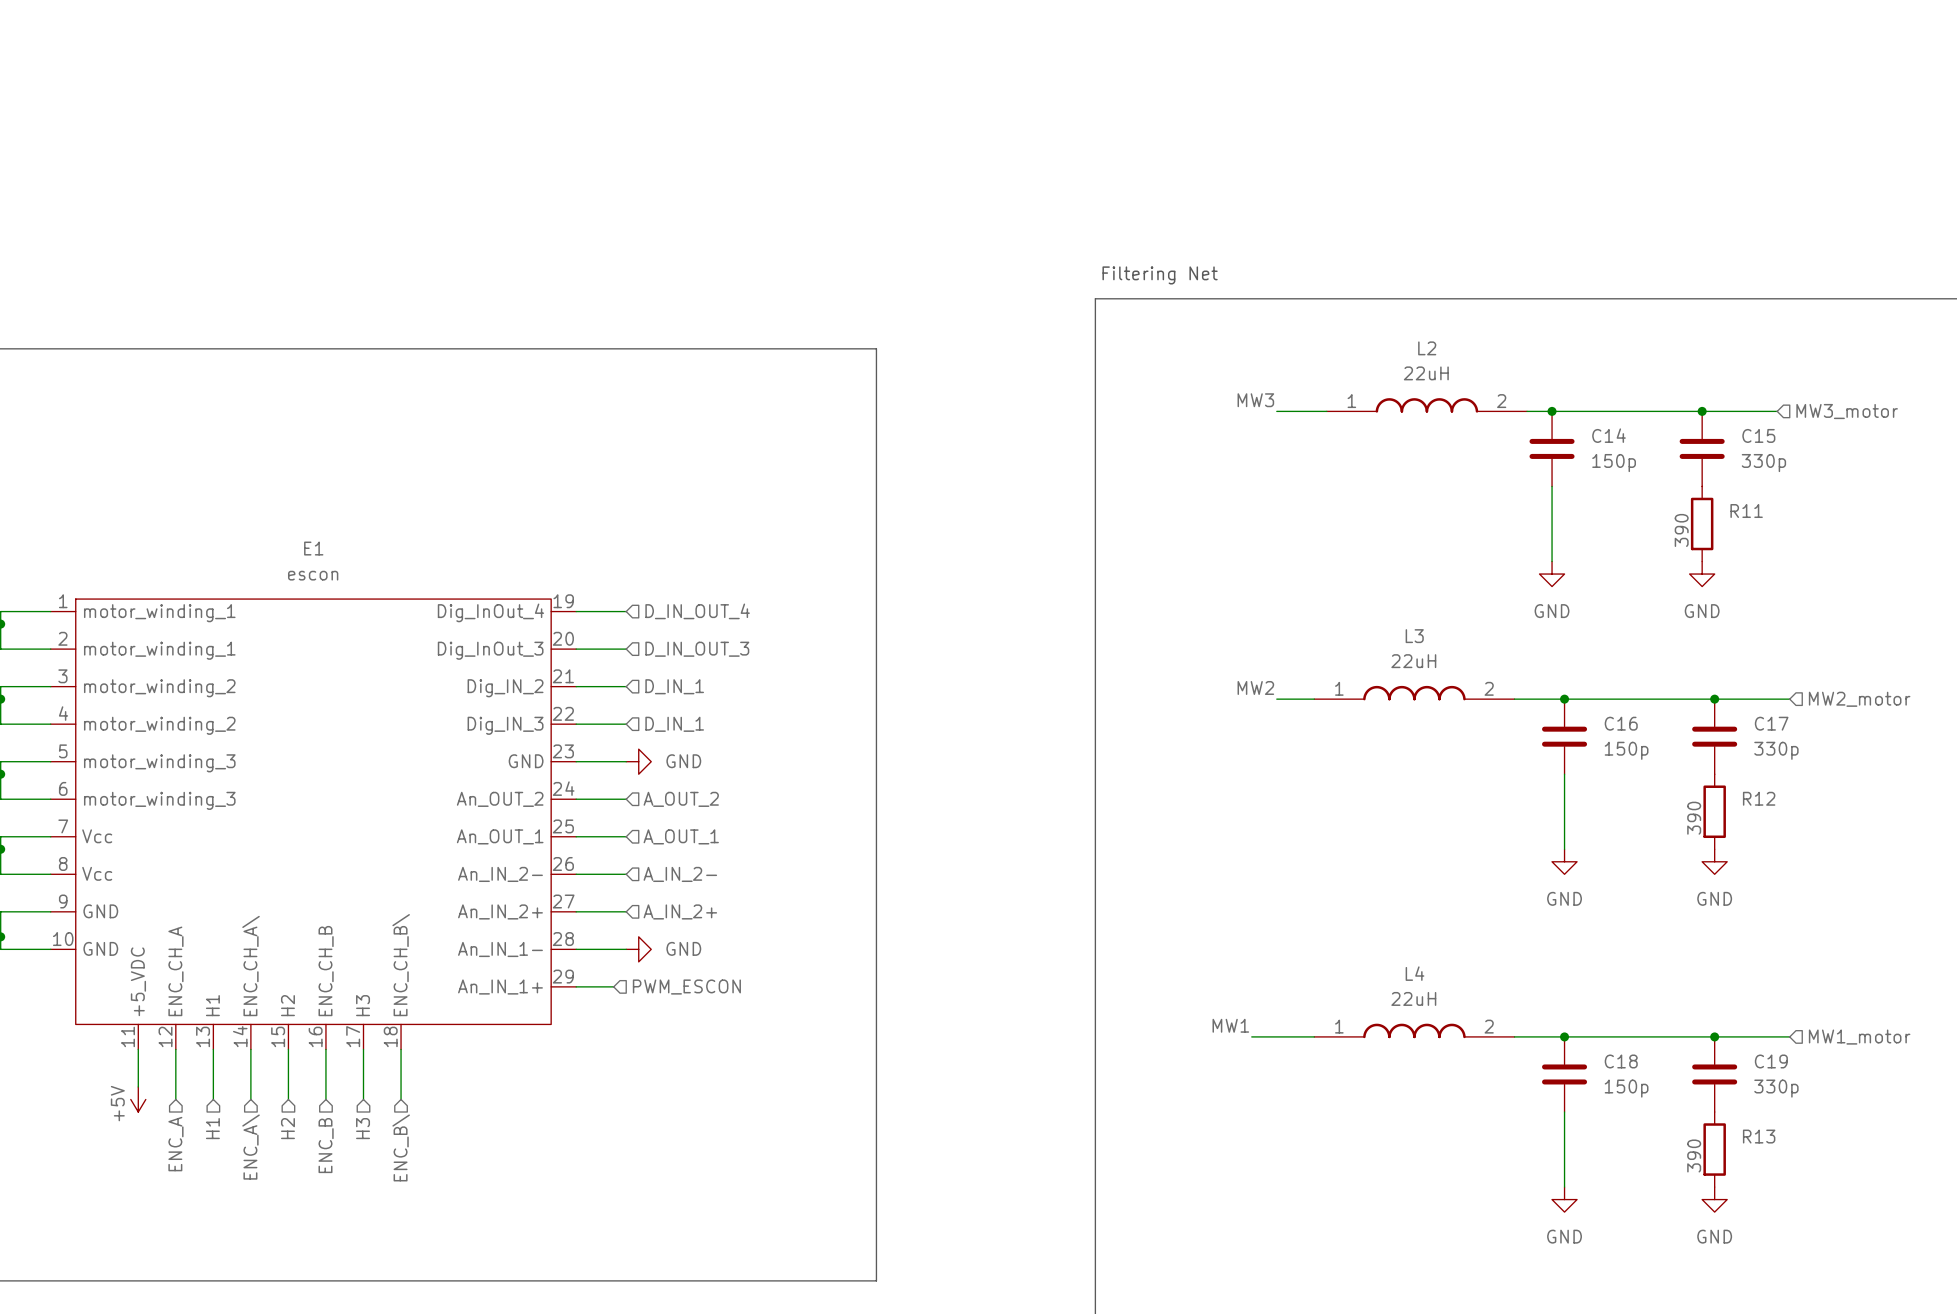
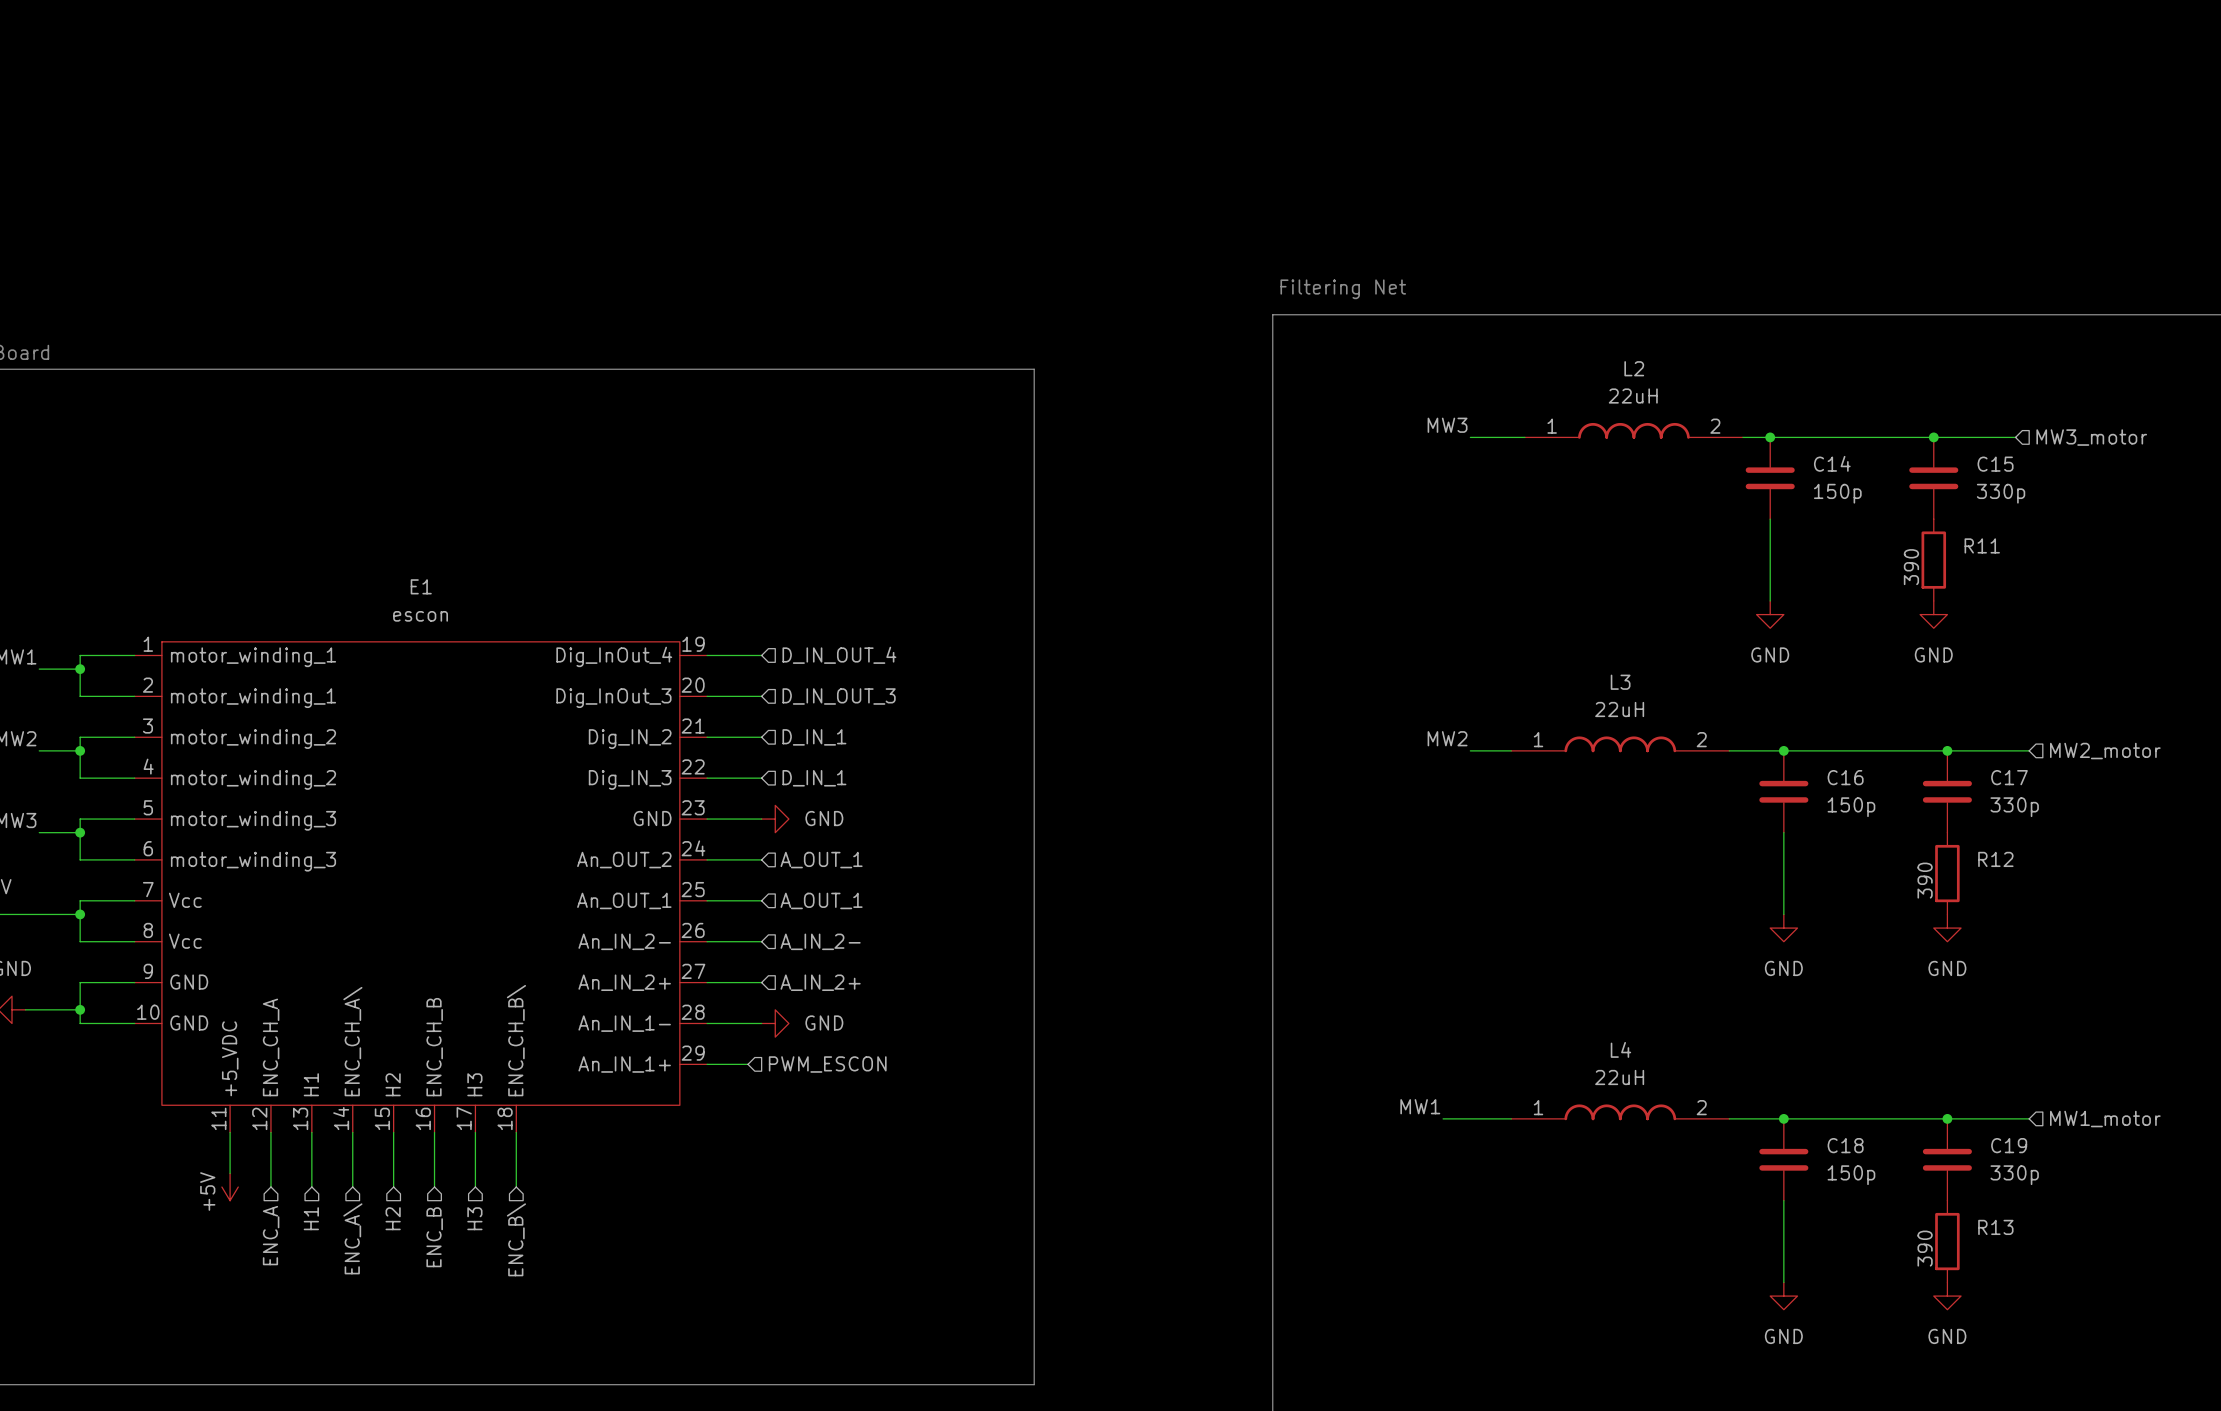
hierarchical label: A_OUT_2 (681, 799) -> A_OUT_1 (821, 860)

